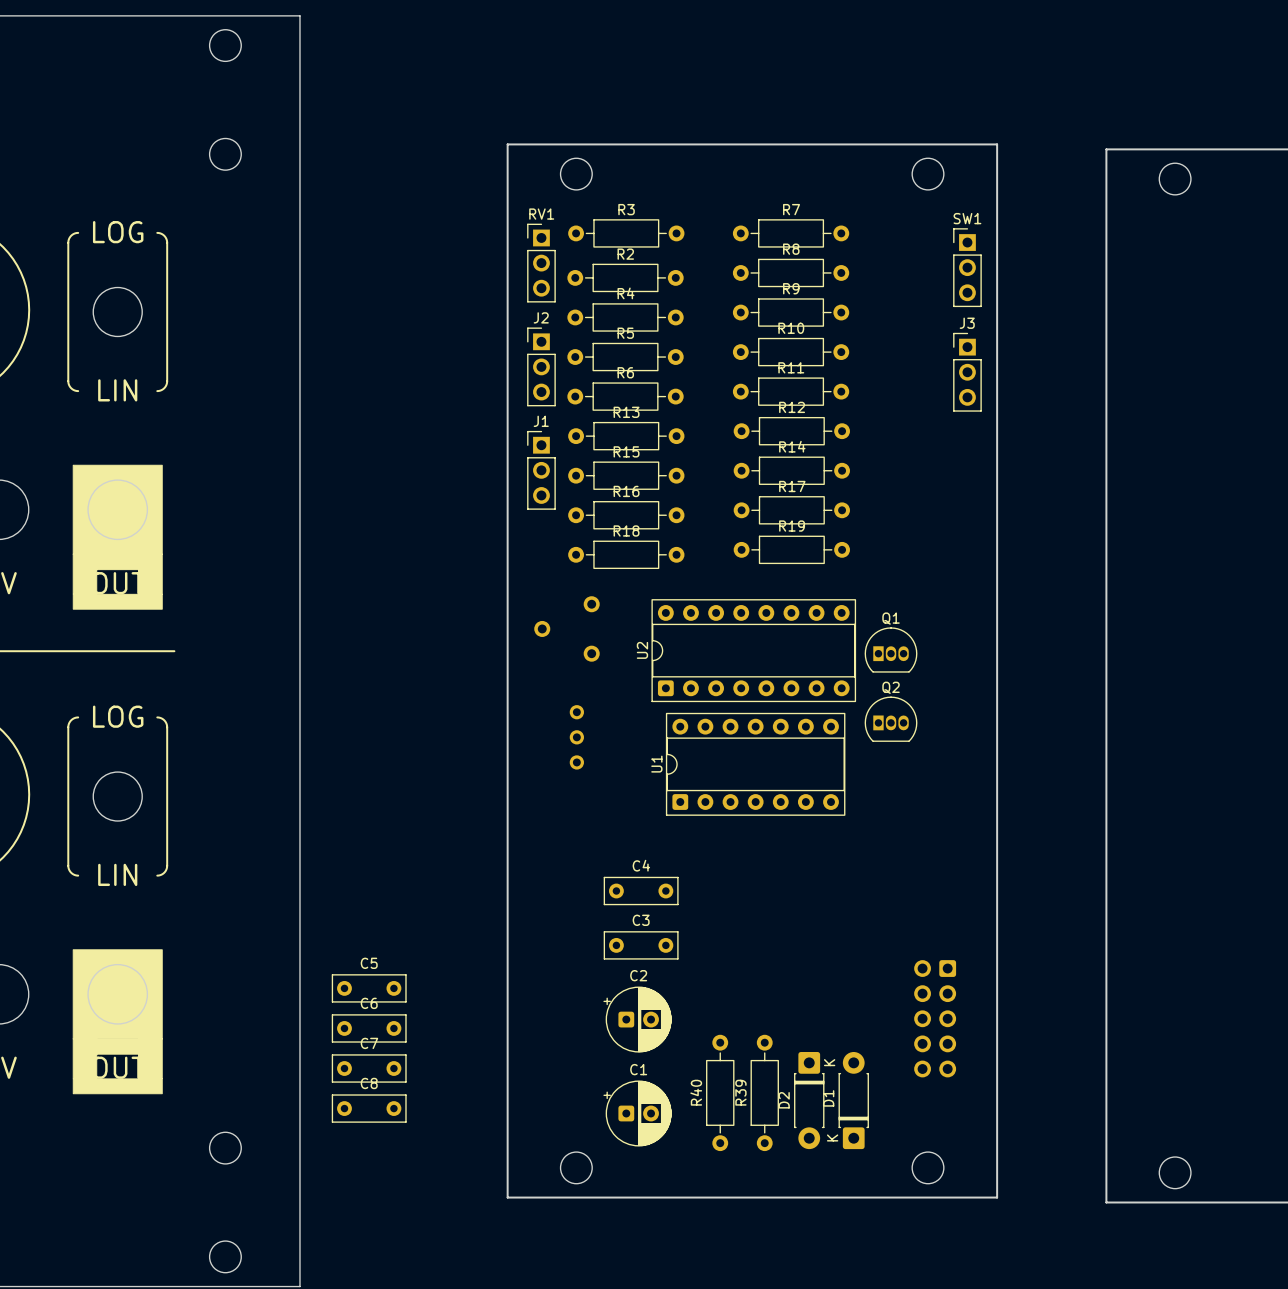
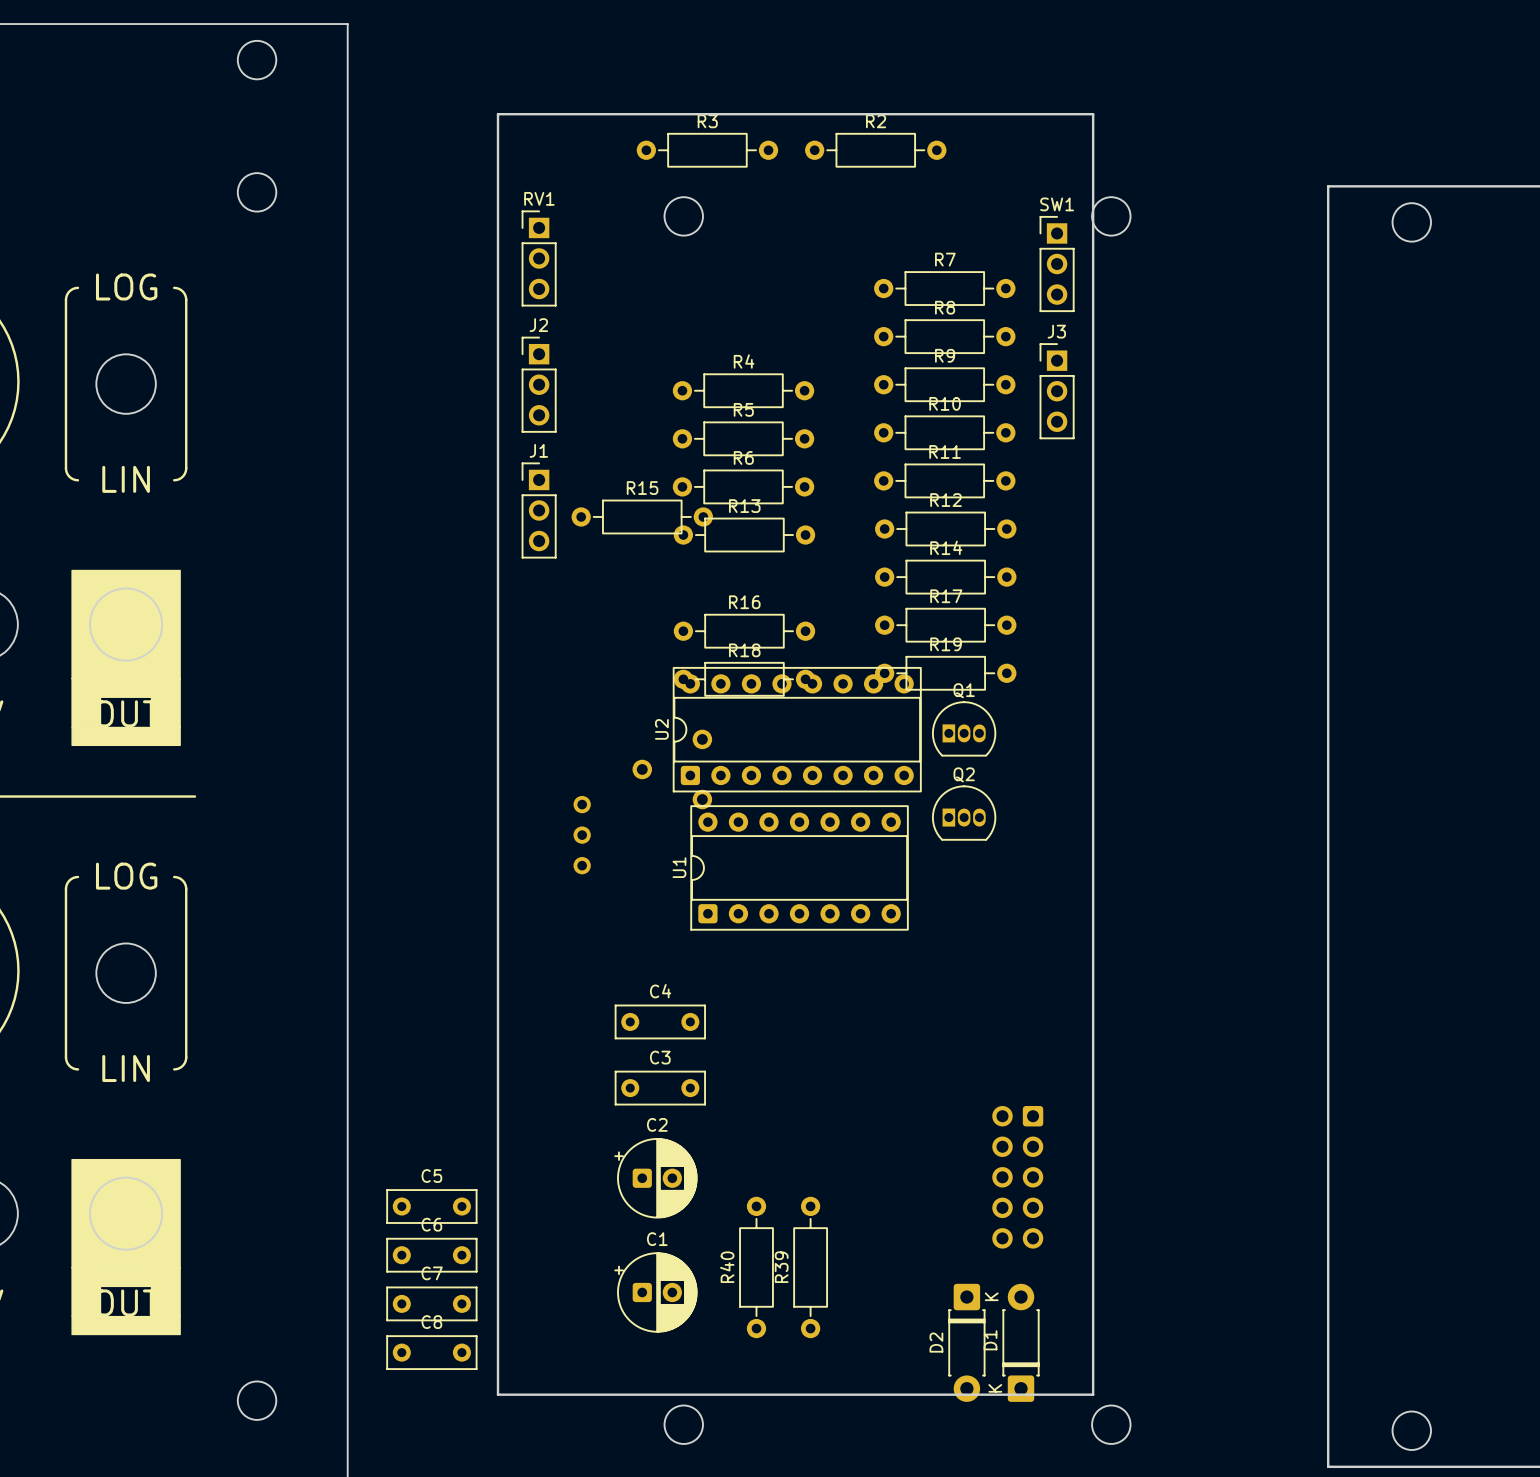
board edge: (507, 144) (997, 144) (997, 1197) (507, 1197) (507, 144) -> (498, 114) (1093, 114) (1093, 1394) (498, 1394) (498, 114)
R3 position: (626, 233) -> (707, 150)
RV1 position: (541, 263) -> (539, 258)
SW1 position: (967, 267) -> (1057, 264)
R2 position: (625, 277) -> (875, 150)
J2 position: (541, 366) -> (539, 384)
J3 position: (967, 372) -> (1057, 391)
J1 position: (541, 470) -> (539, 510)
R15 position: (626, 475) -> (642, 516)
Q1 position: (891, 649) -> (964, 728)
U2 position: (753, 650) -> (797, 729)
Q2 position: (891, 719) -> (964, 813)
part position: (576, 737) -> (582, 835)
U1 position: (755, 764) -> (799, 867)
C4 position: (641, 891) -> (660, 1021)
C3 position: (641, 945) -> (660, 1088)
part position: (935, 1018) -> (1017, 1177)
C2 position: (637, 1019) -> (655, 1178)
R40 position: (720, 1092) -> (756, 1267)
R39 position: (764, 1092) -> (810, 1267)
C1 position: (637, 1113) -> (655, 1292)

